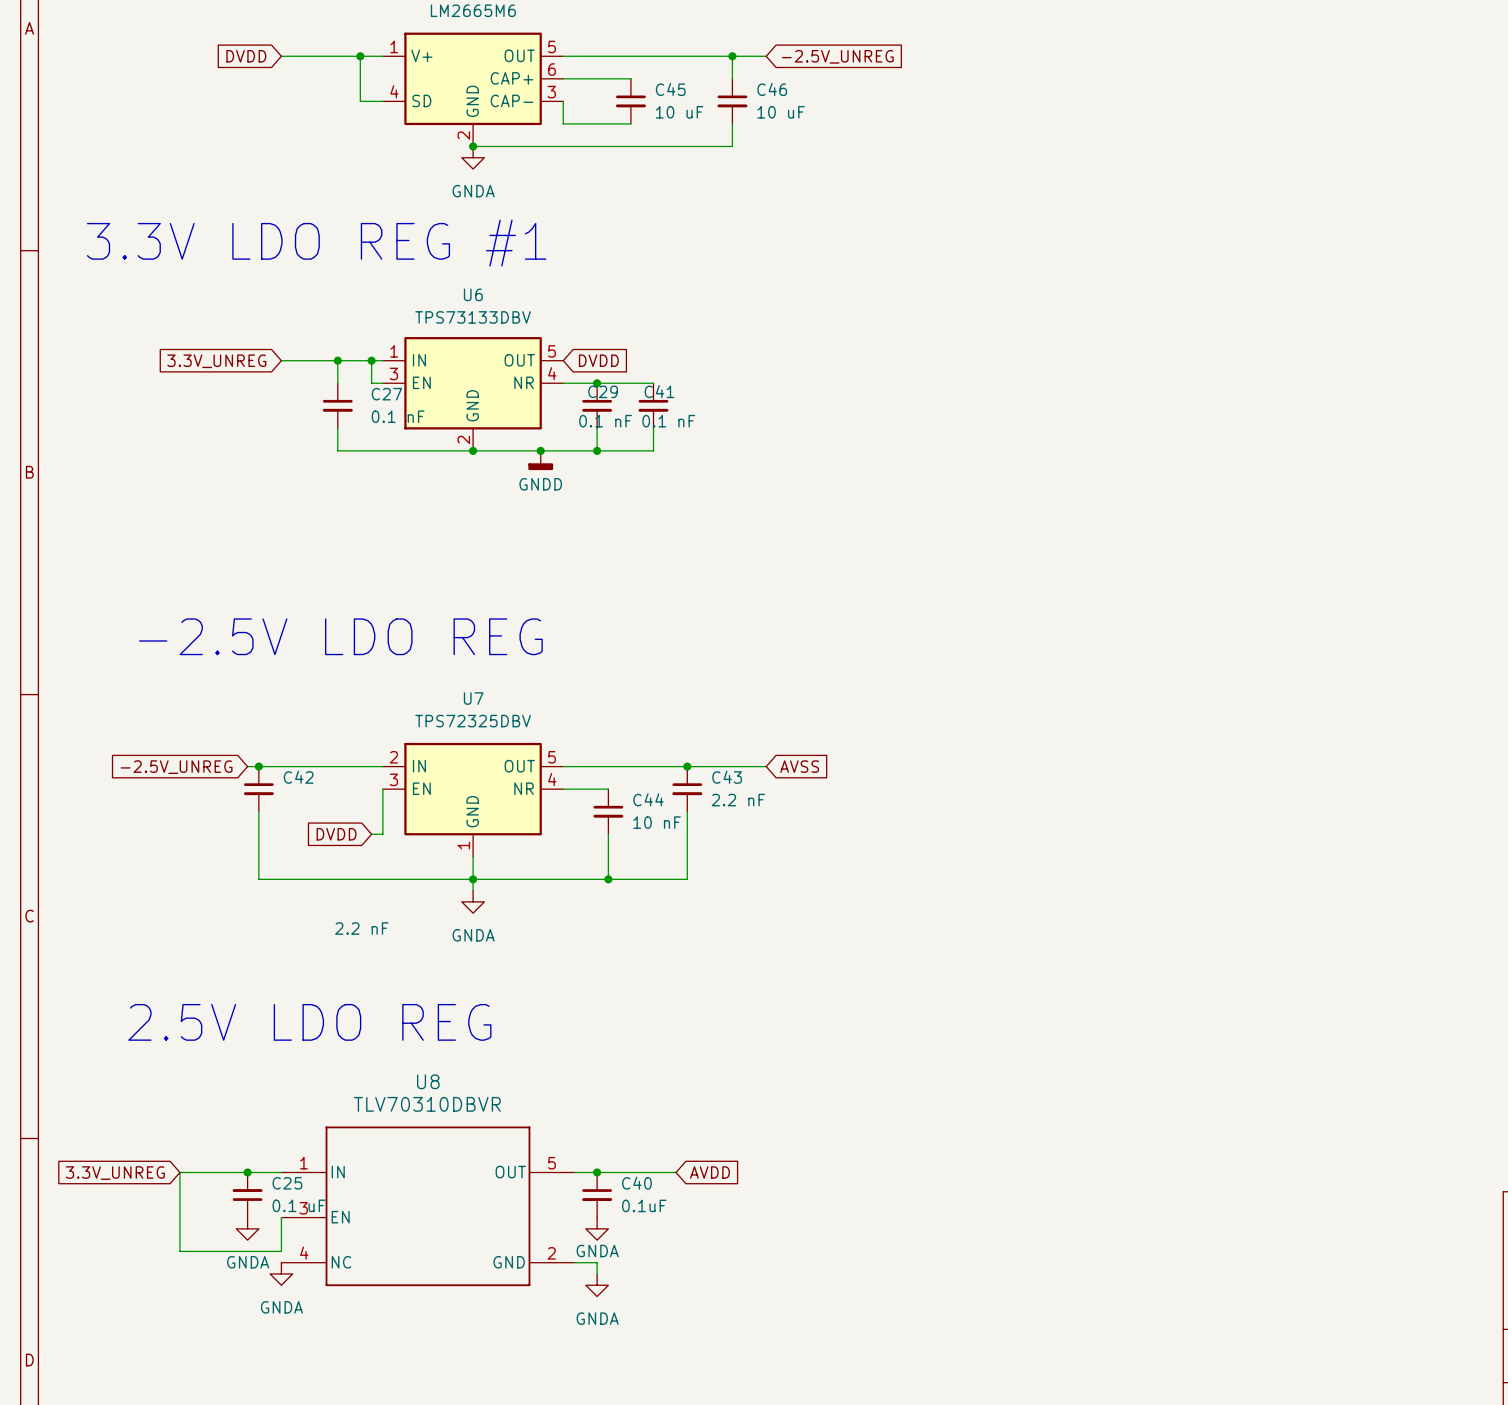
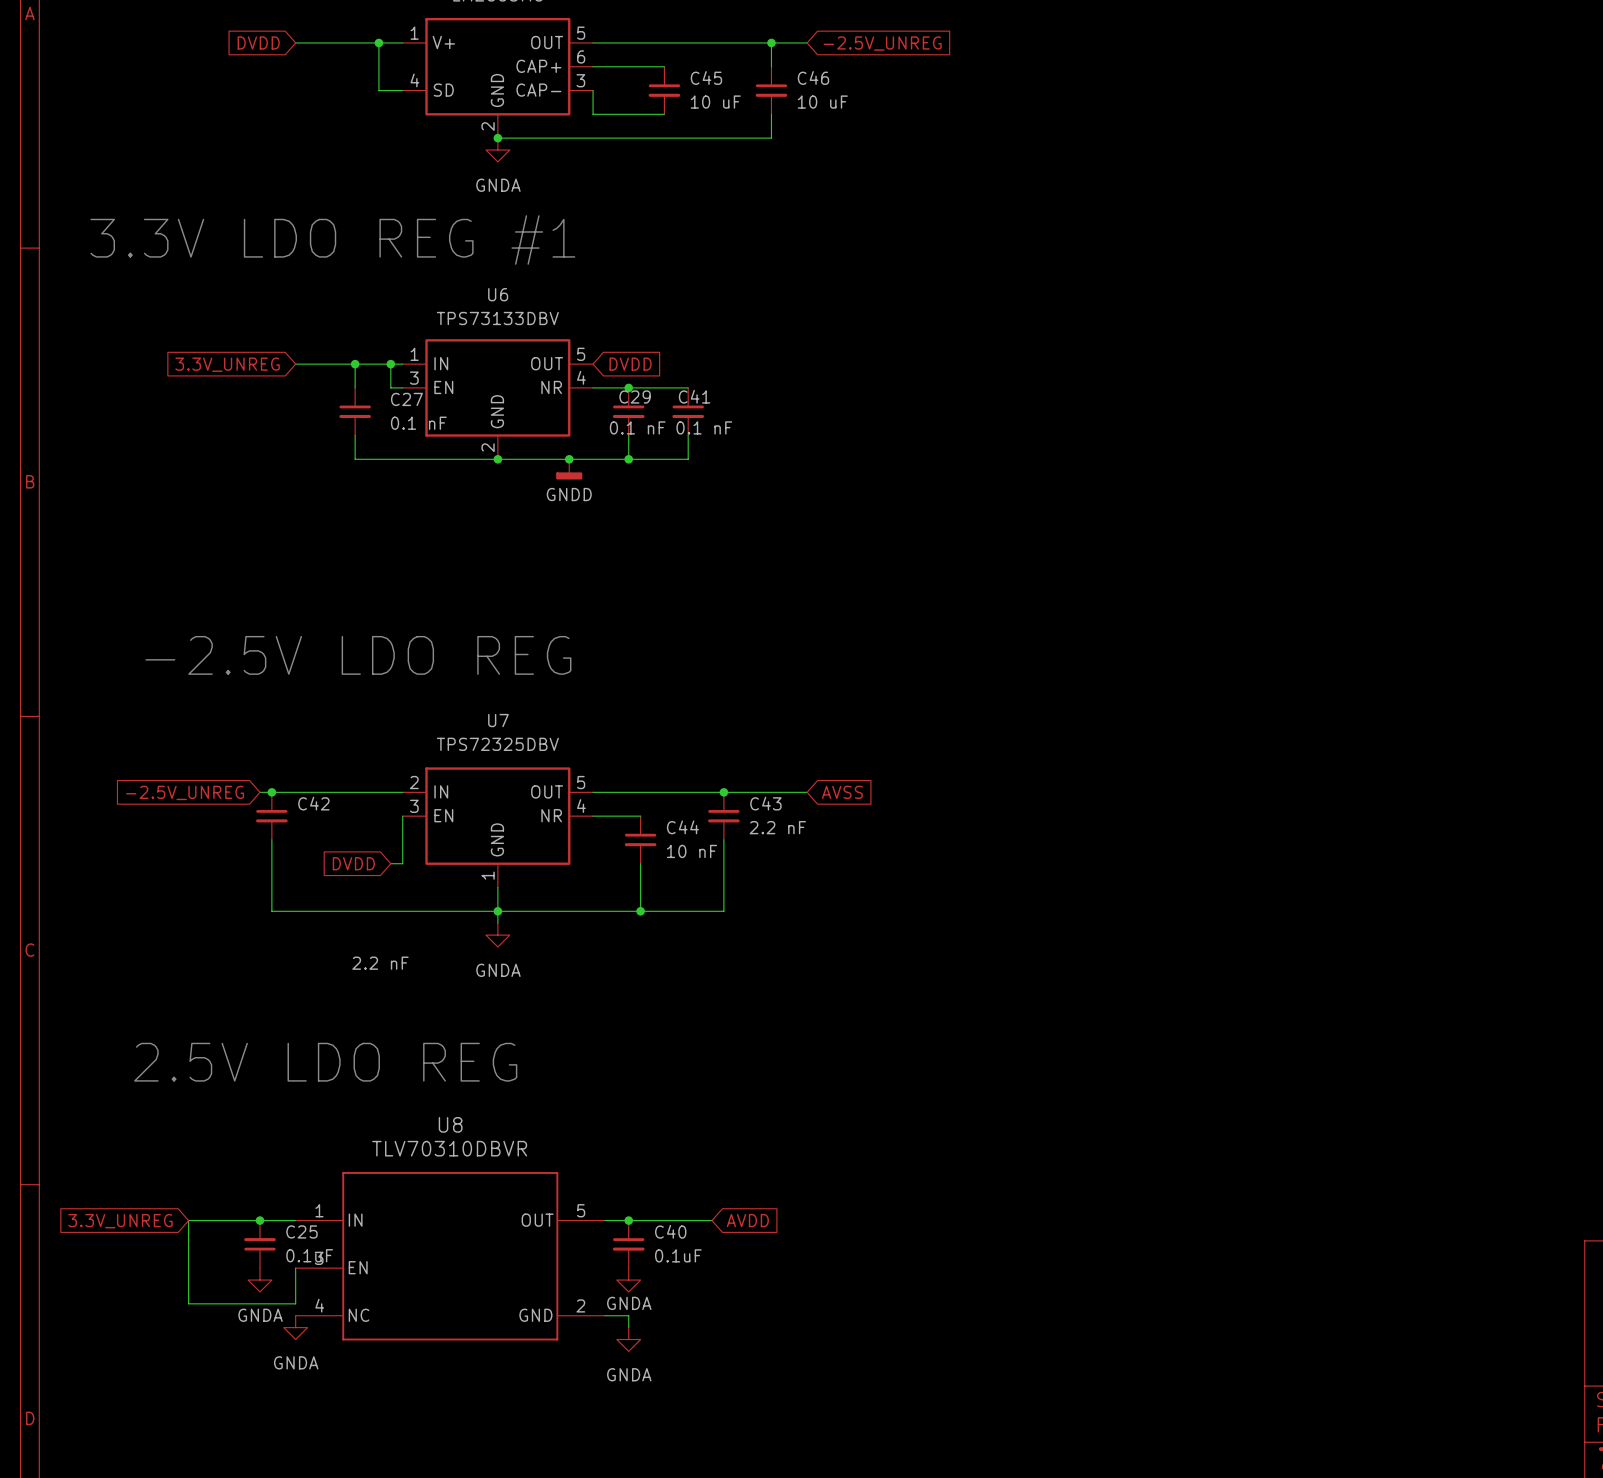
C25 value: 0.1 uF (298, 1205) -> 0.1uF (309, 1255)

